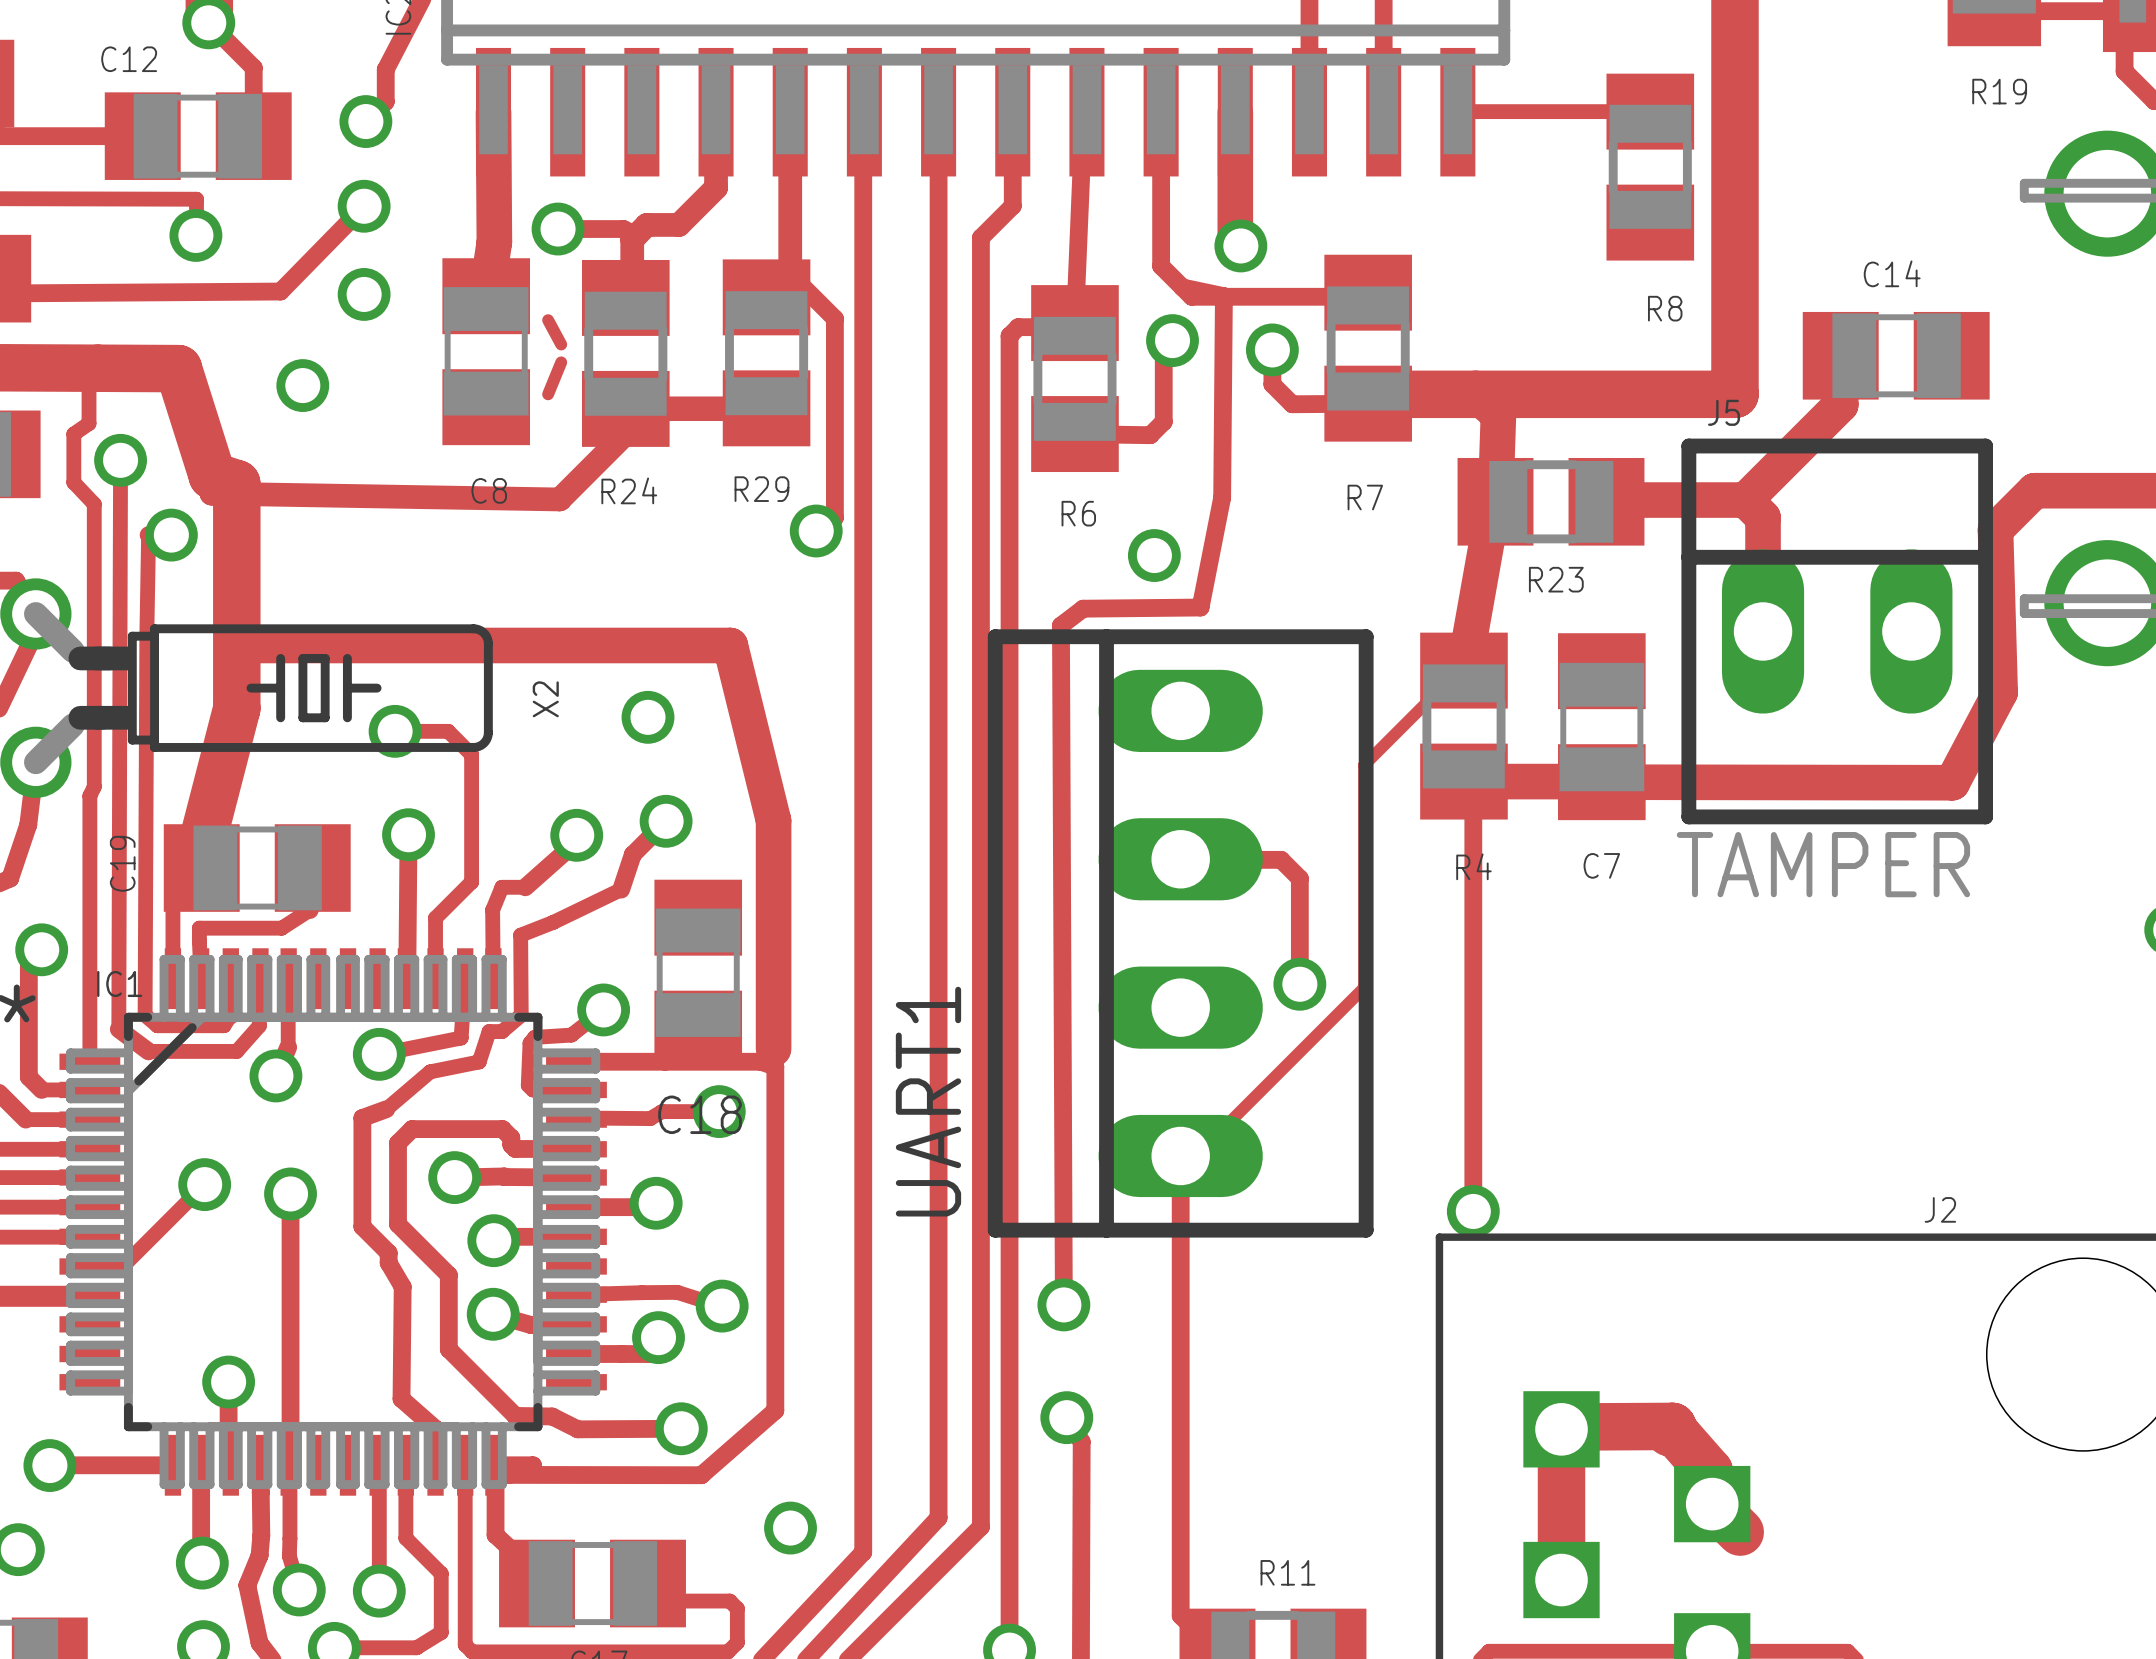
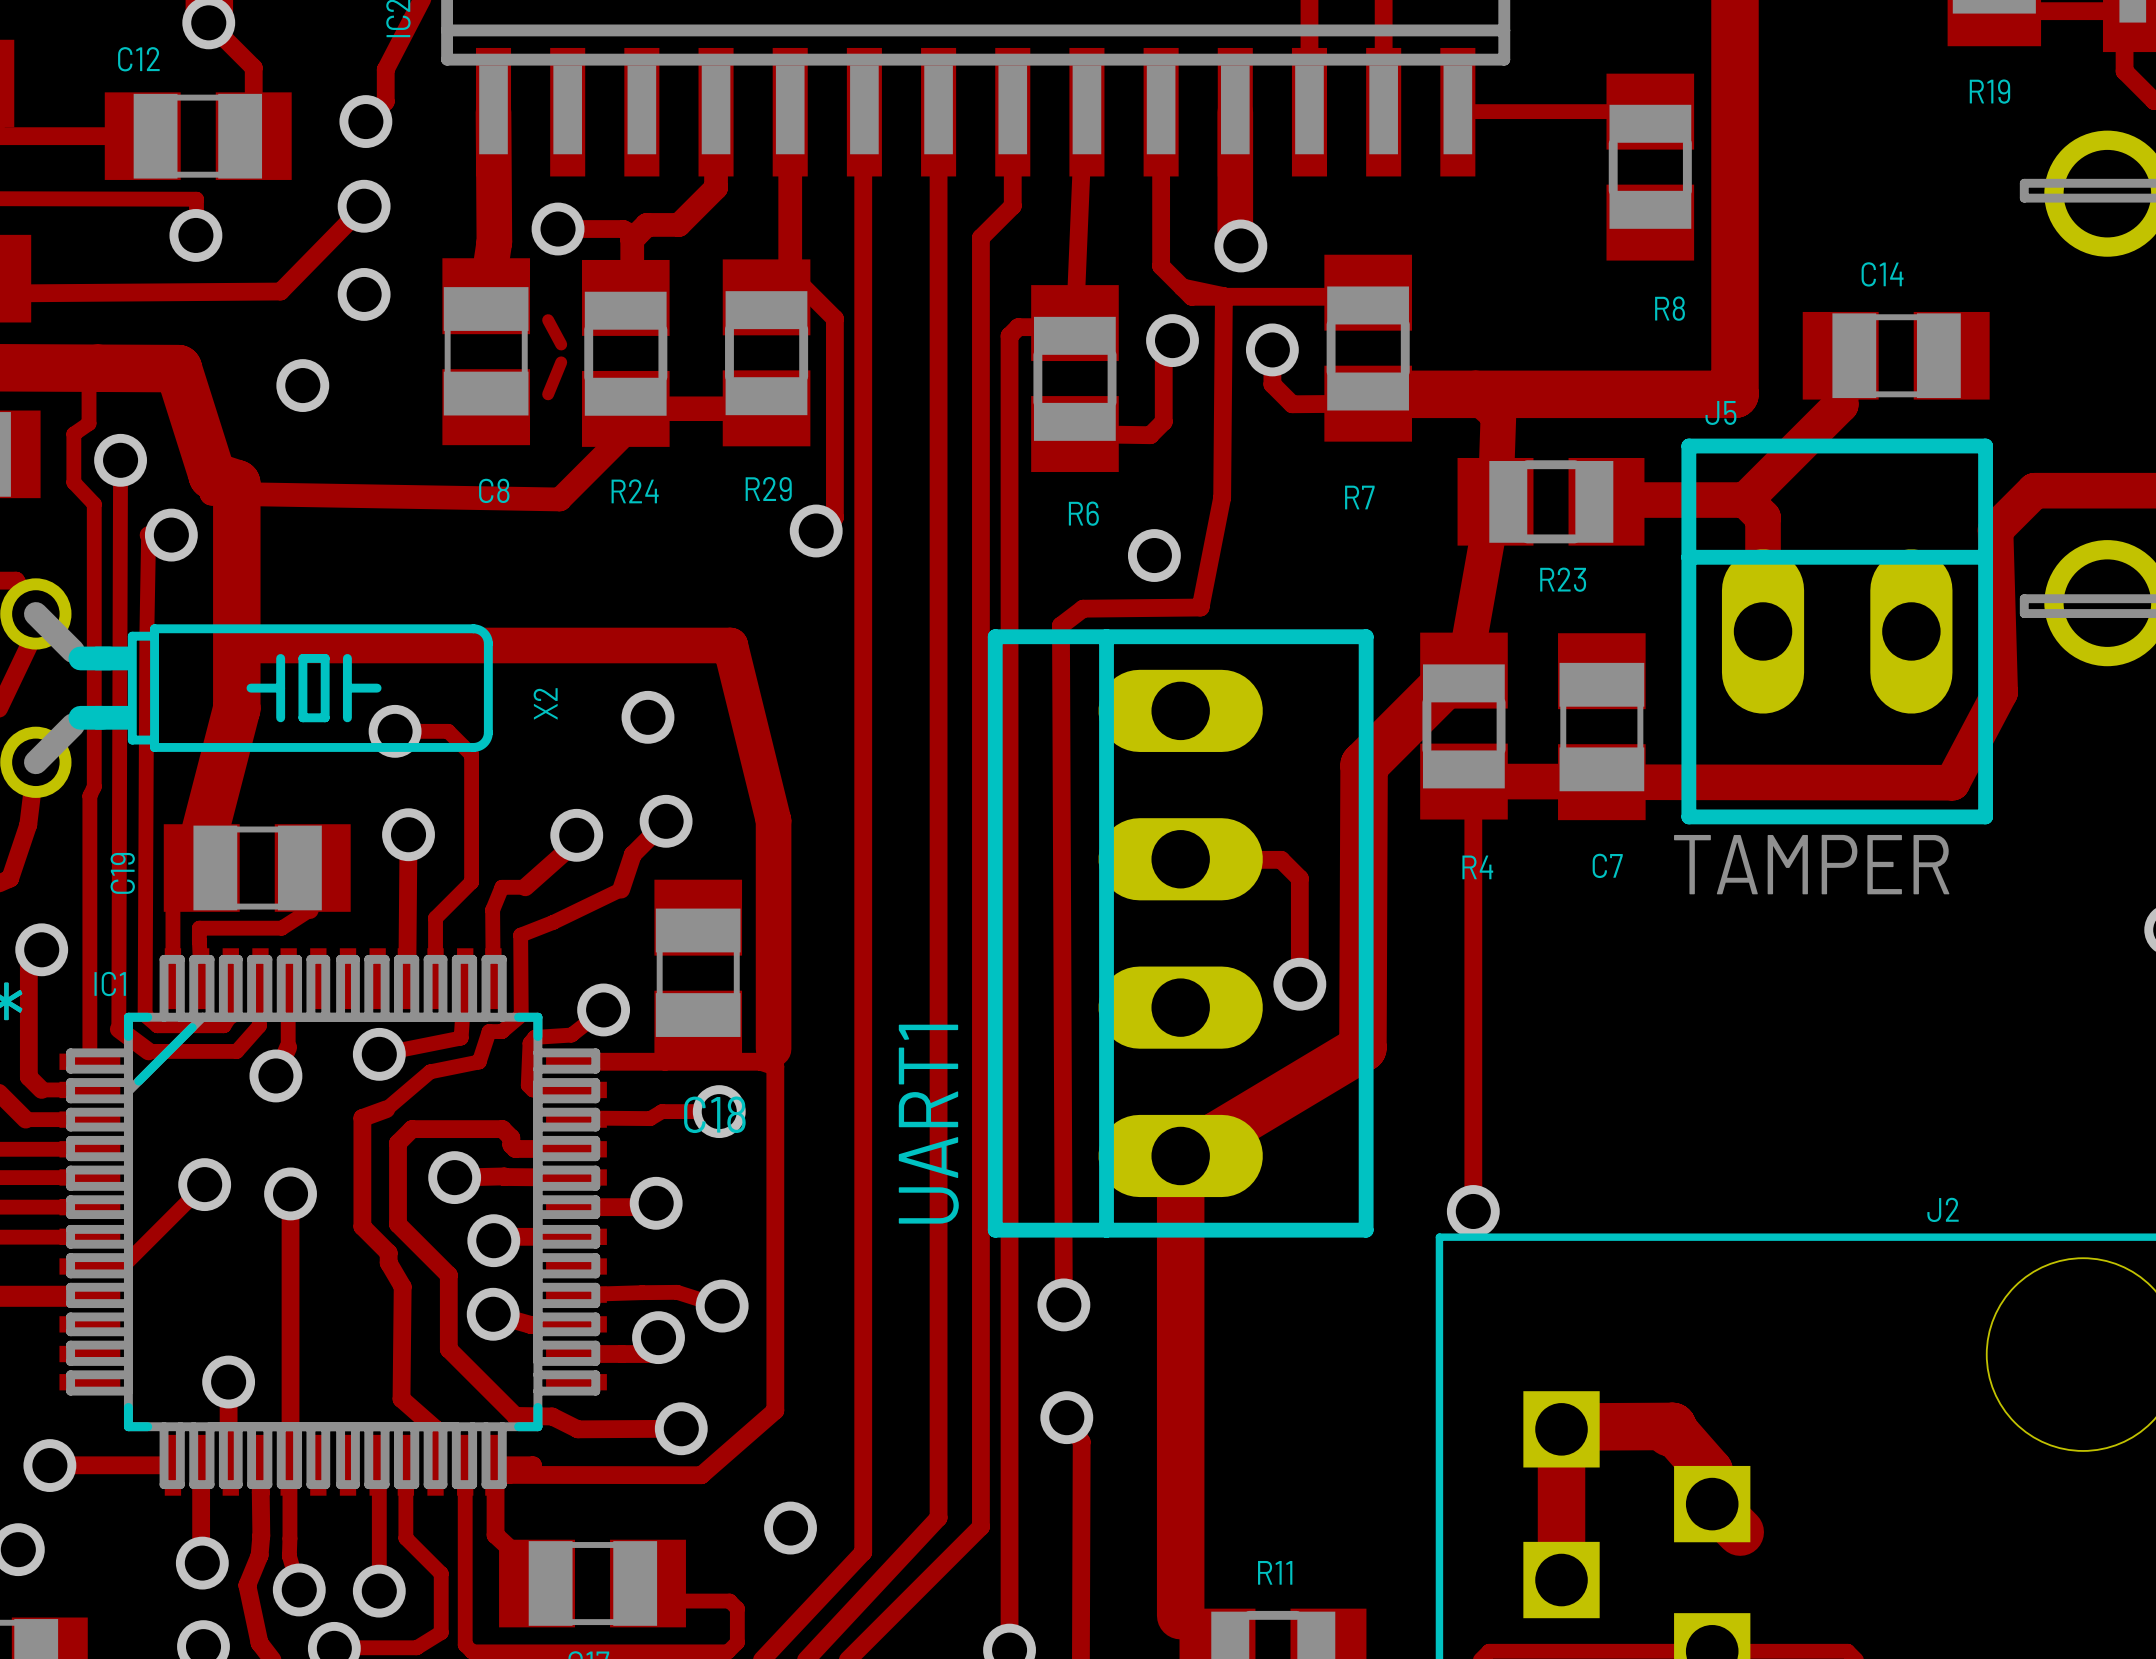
track width: thin (1438, 691) (1364, 765) -> thick (1438, 691) (1364, 765)
track: (1364, 765) (1364, 987) (1215, 1136) -> (1364, 765) (1362, 1047) (1215, 1136)
track width: thin (1215, 1136) (1180, 1155) (1180, 1615) -> thick (1215, 1136) (1180, 1155) (1180, 1615)

